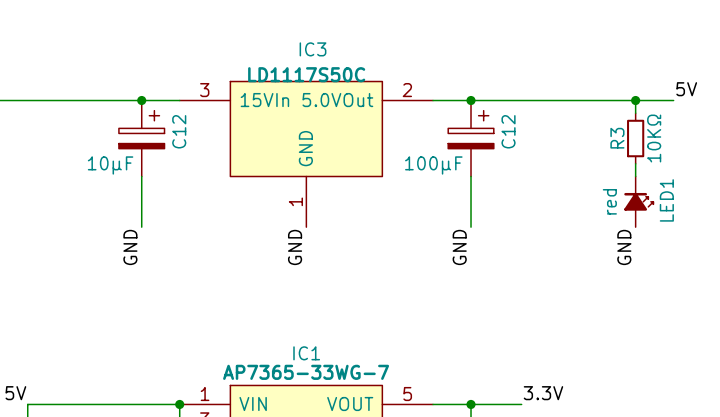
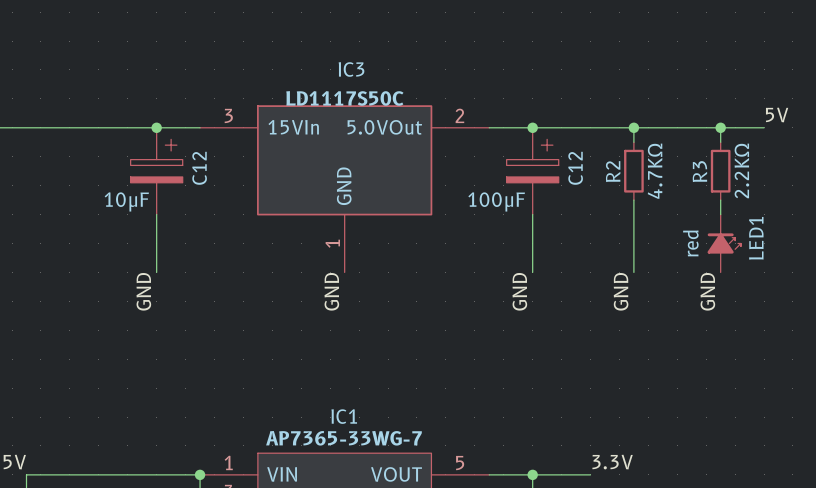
wire: none -> (633, 127) (633, 142)
junction: none -> (633, 127)
R2: none -> 4.7KΩ (633, 171)
R3 value: 10KΩ (654, 138) -> 2.2KΩ (741, 170)
wire: none -> (633, 200) (633, 272)
label: none -> GND (621, 291)

